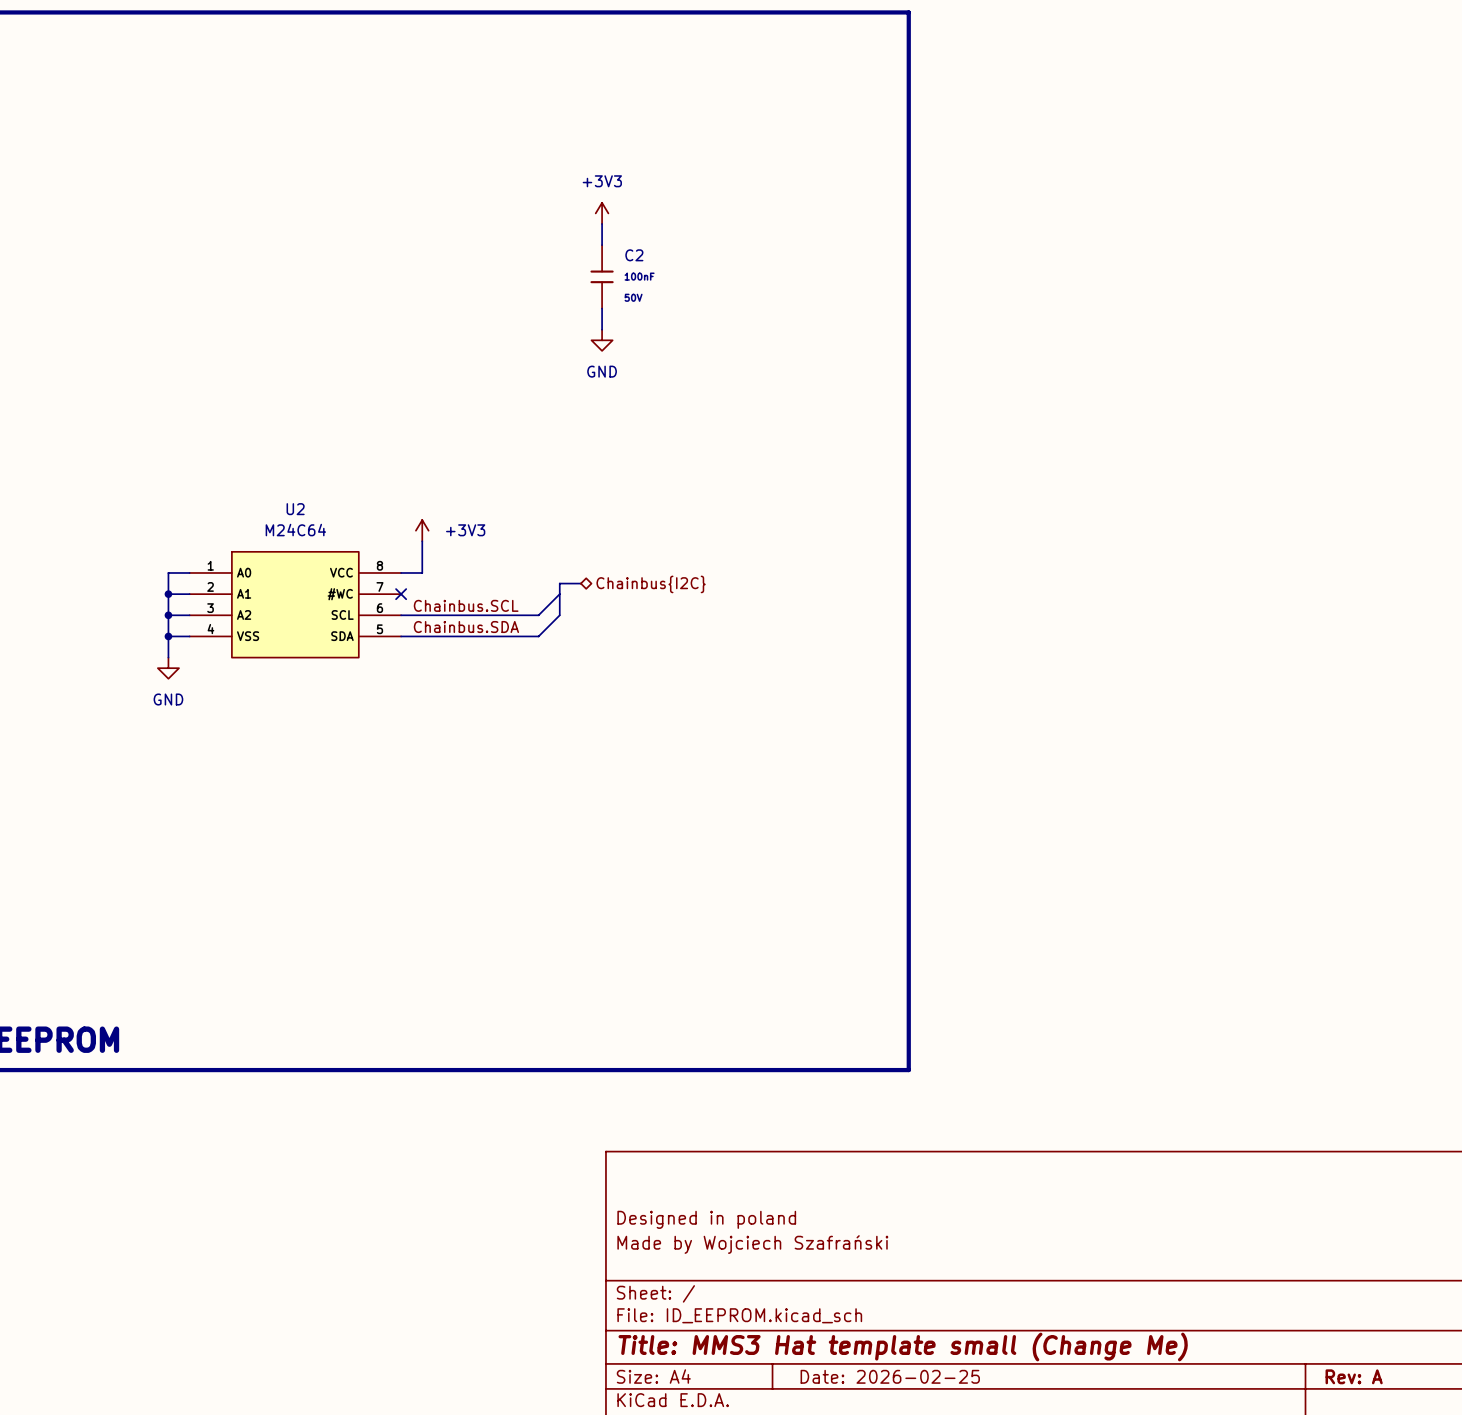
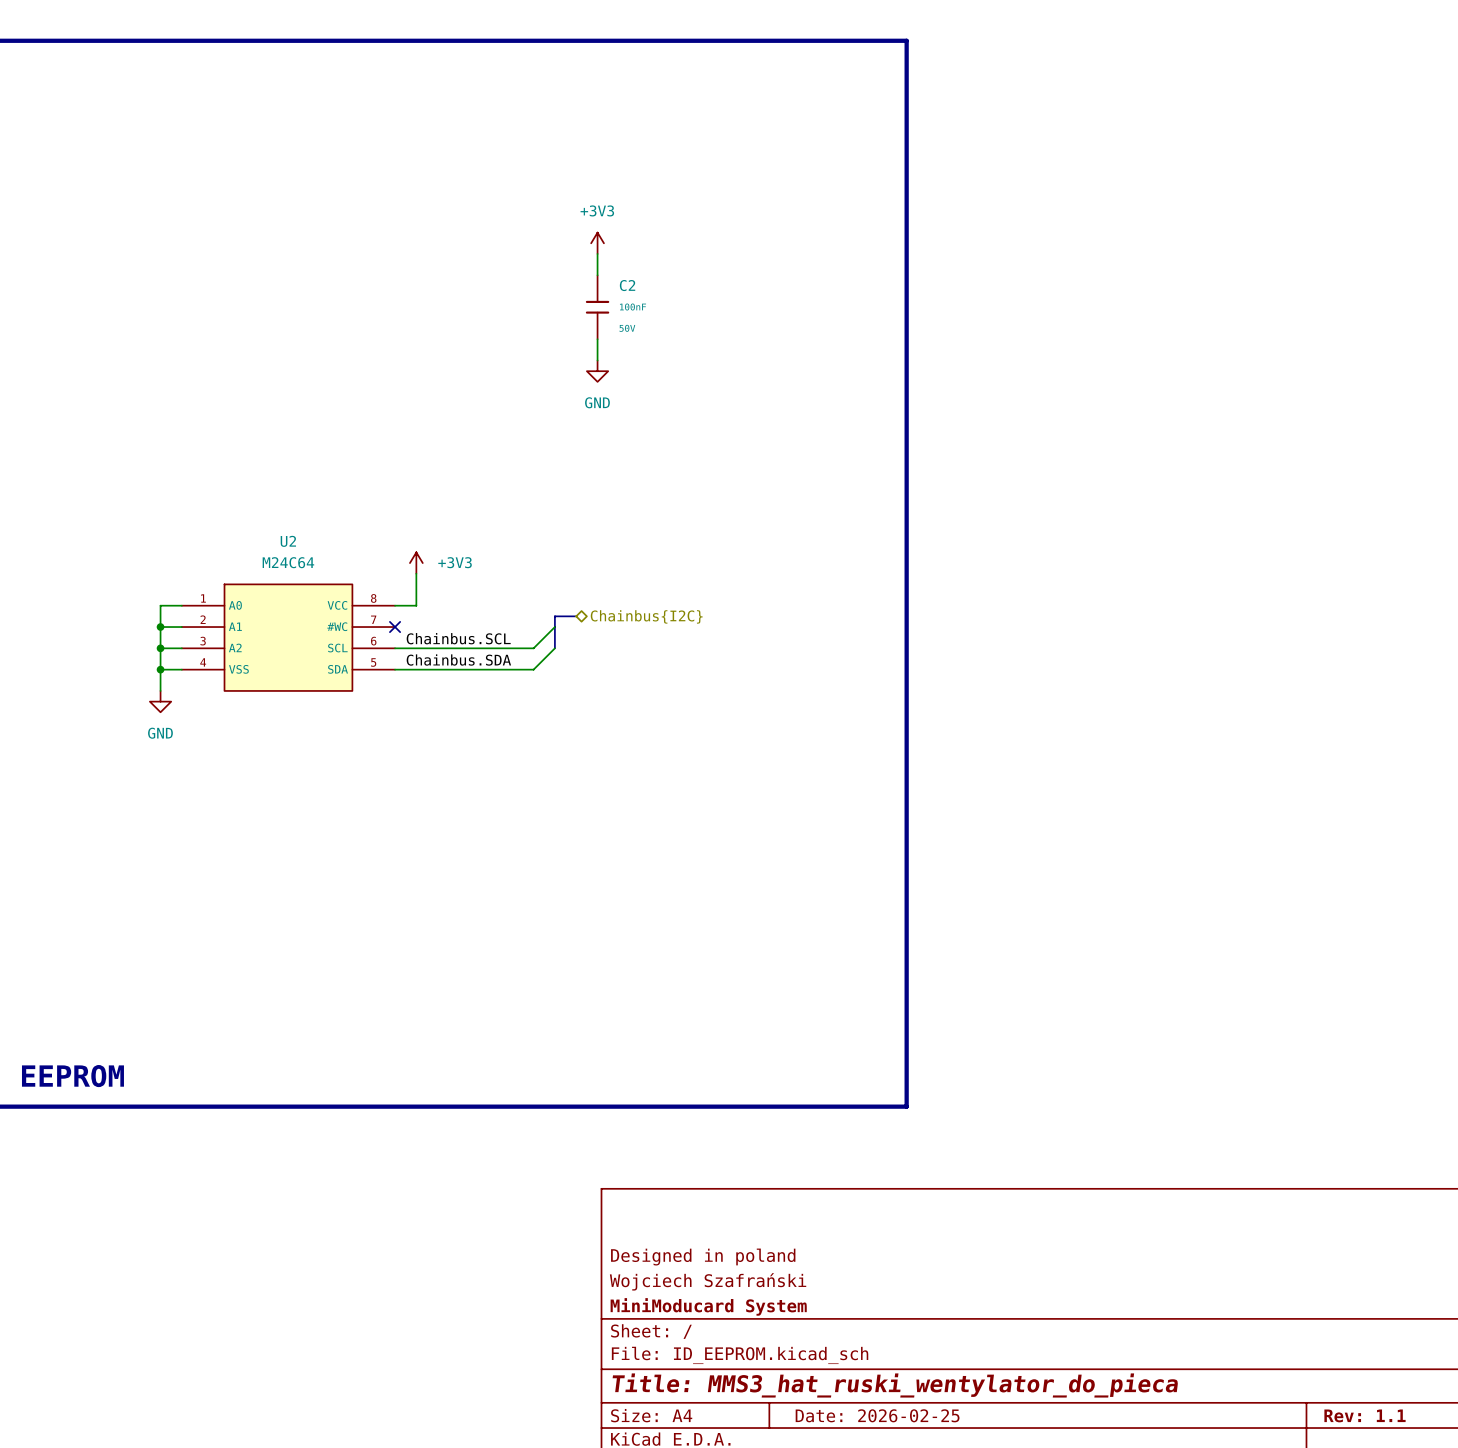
title block: Made by Wojciech Szafrański (752, 1244) -> Wojciech Szafrański (708, 1281)
title block: none -> MiniModucard System (708, 1306)
title block: Title: MMS3 Hat template small (Change Me) (903, 1346) -> Title: MMS3_hat_ruski_wentylator_do_pieca (895, 1385)
title block: Rev: A (1354, 1376) -> Rev: 1.1 (1365, 1415)

